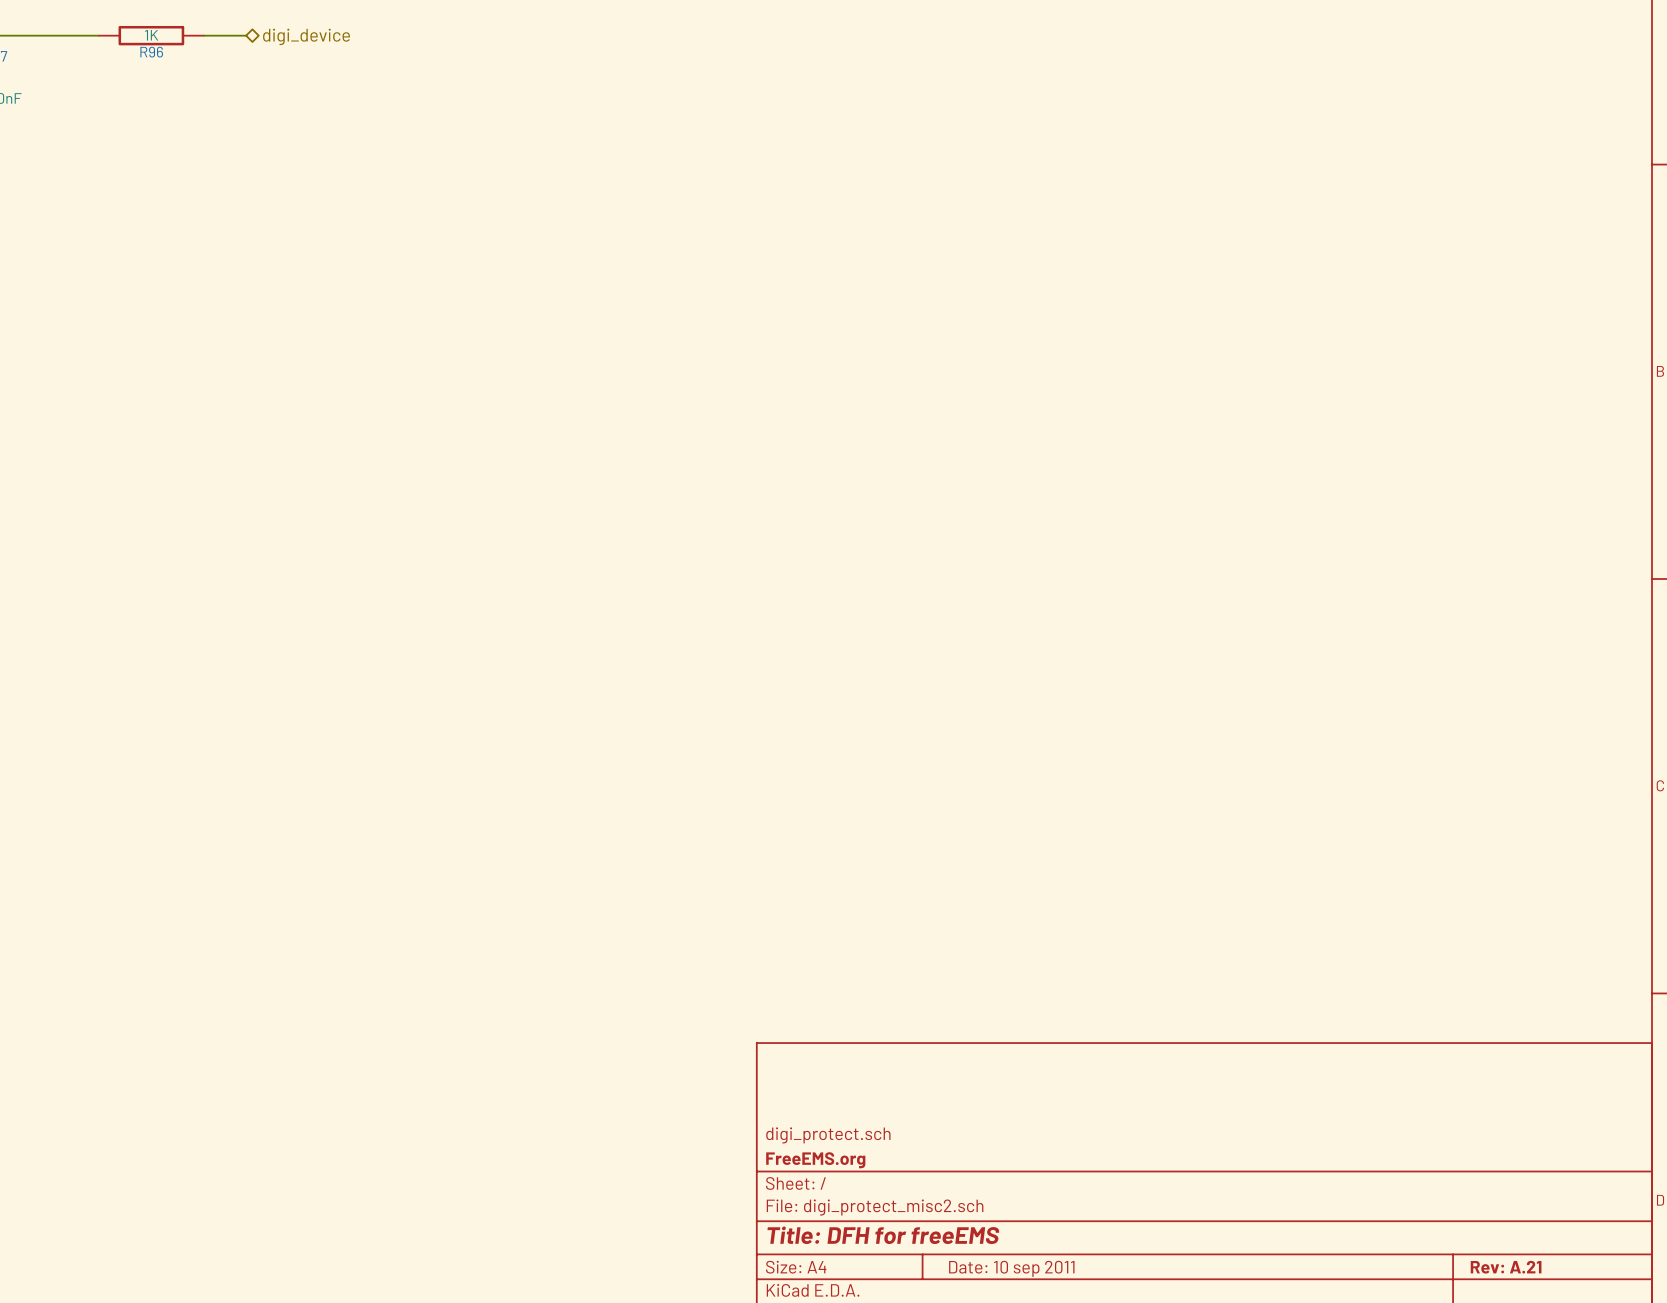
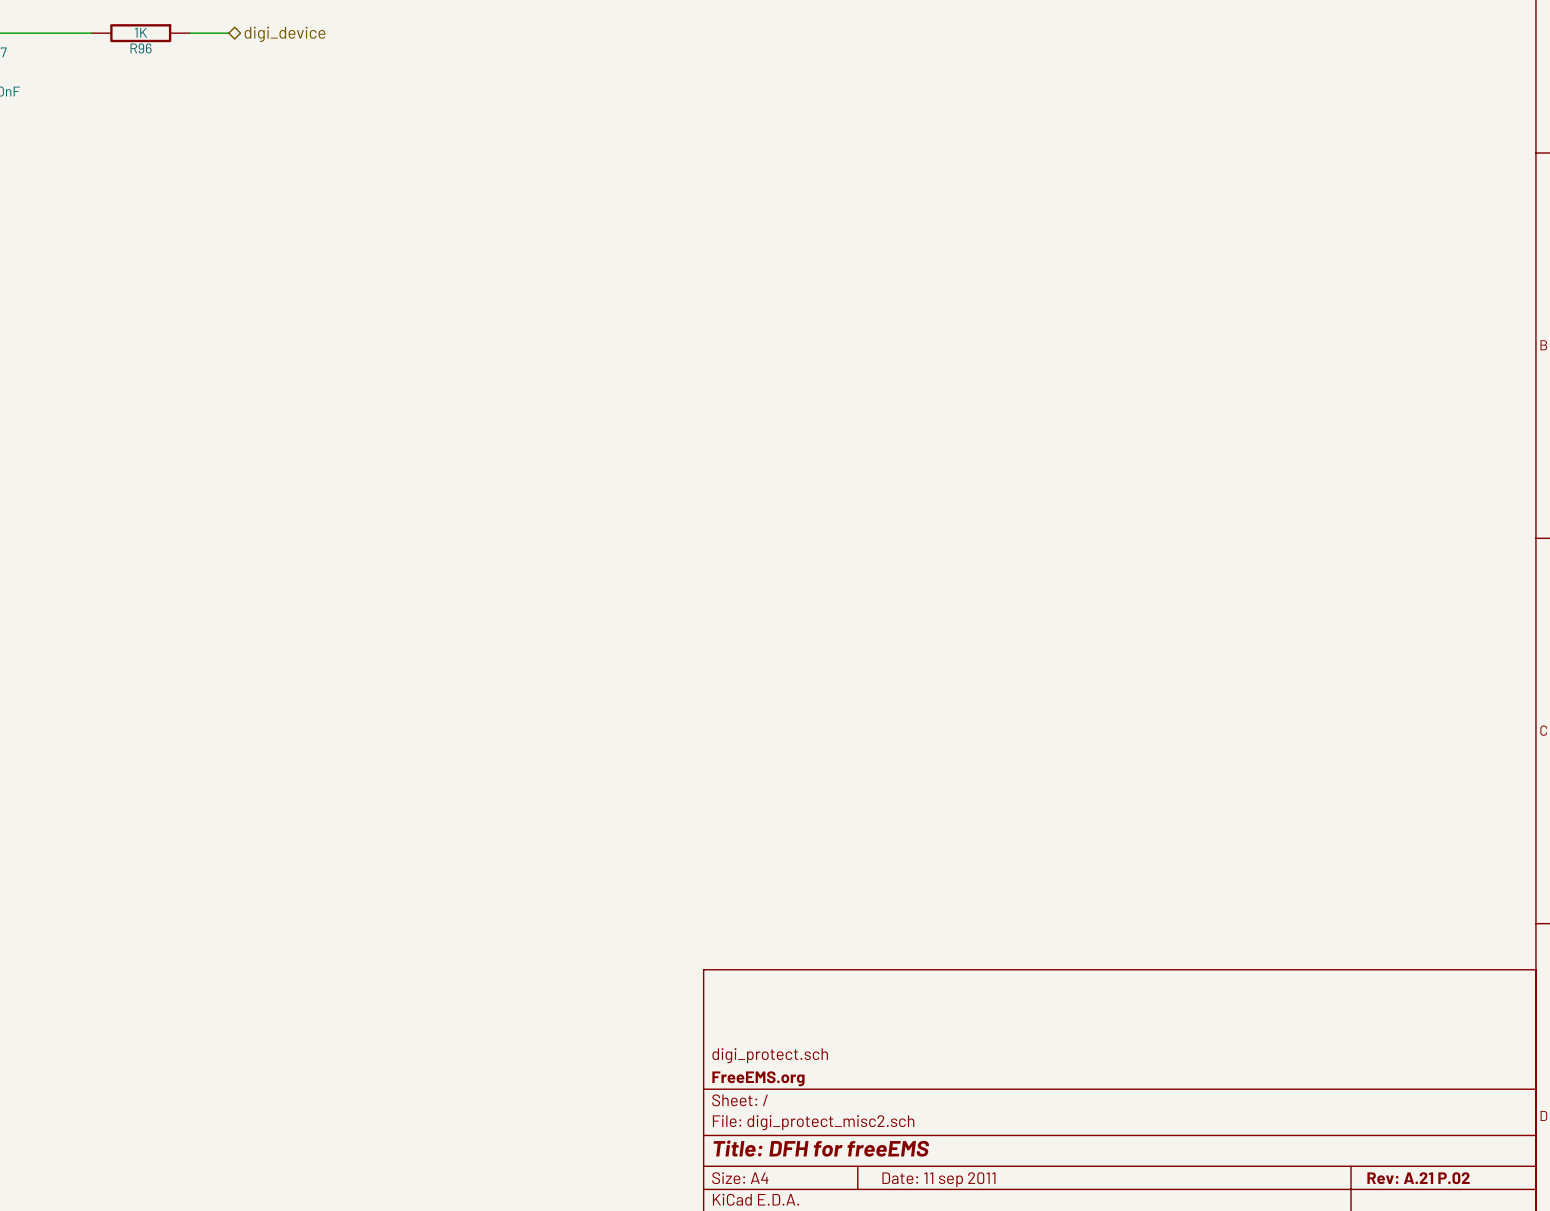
title block: Rev: A.21 (1506, 1267) -> Rev: A.21 P.02 (1418, 1178)
title block: Date: 10 sep 2011 (1011, 1268) -> Date: 11 sep 2011 (938, 1179)

